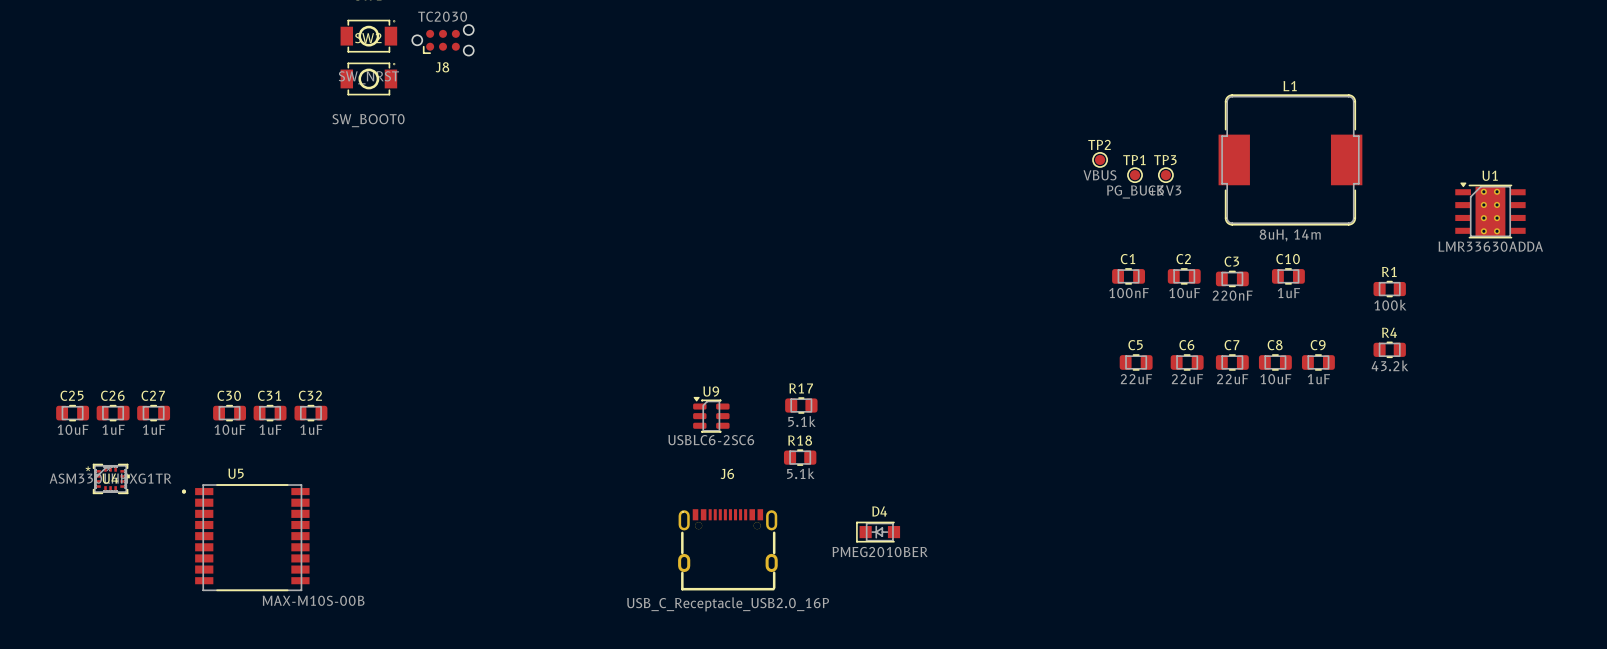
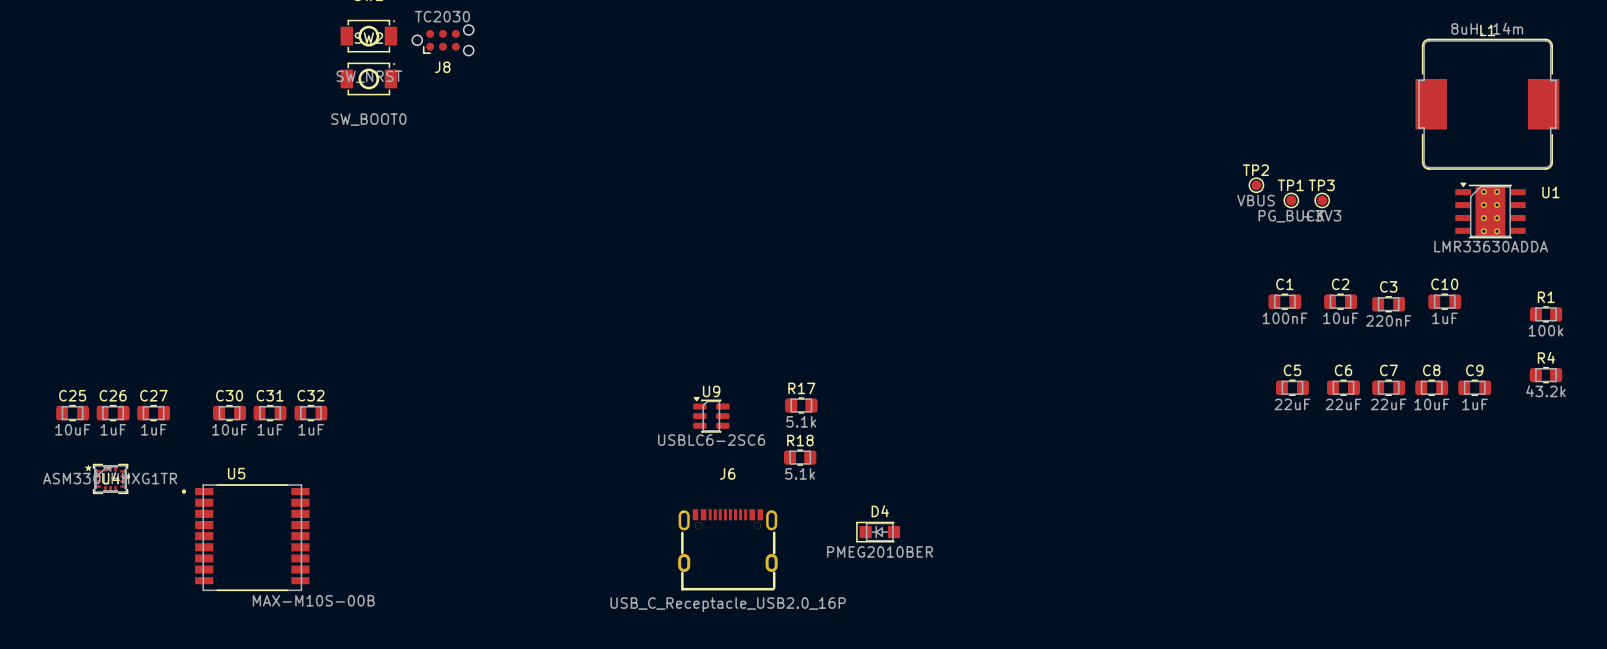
TP2 position: (1100, 159) -> (1256, 185)
L1 position: (1290, 159) -> (1487, 104)
TP1 position: (1135, 175) -> (1291, 200)
TP3 position: (1165, 175) -> (1322, 200)
U1 name position: U1 (1490, 175) -> U1 (1550, 192)
L1 value position: 8uH, 14m (1290, 235) -> 8uH, 14m (1487, 29)
C1 position: (1128, 276) -> (1284, 301)
C2 position: (1184, 276) -> (1340, 301)
C10 position: (1288, 276) -> (1444, 301)
C3 position: (1232, 278) -> (1388, 304)
R1 position: (1389, 289) -> (1546, 314)
R4 position: (1389, 349) -> (1546, 375)
C5 position: (1136, 362) -> (1292, 387)
C6 position: (1187, 362) -> (1343, 387)
C7 position: (1232, 362) -> (1388, 387)
C8 position: (1275, 362) -> (1431, 387)
C9 position: (1318, 362) -> (1474, 387)

